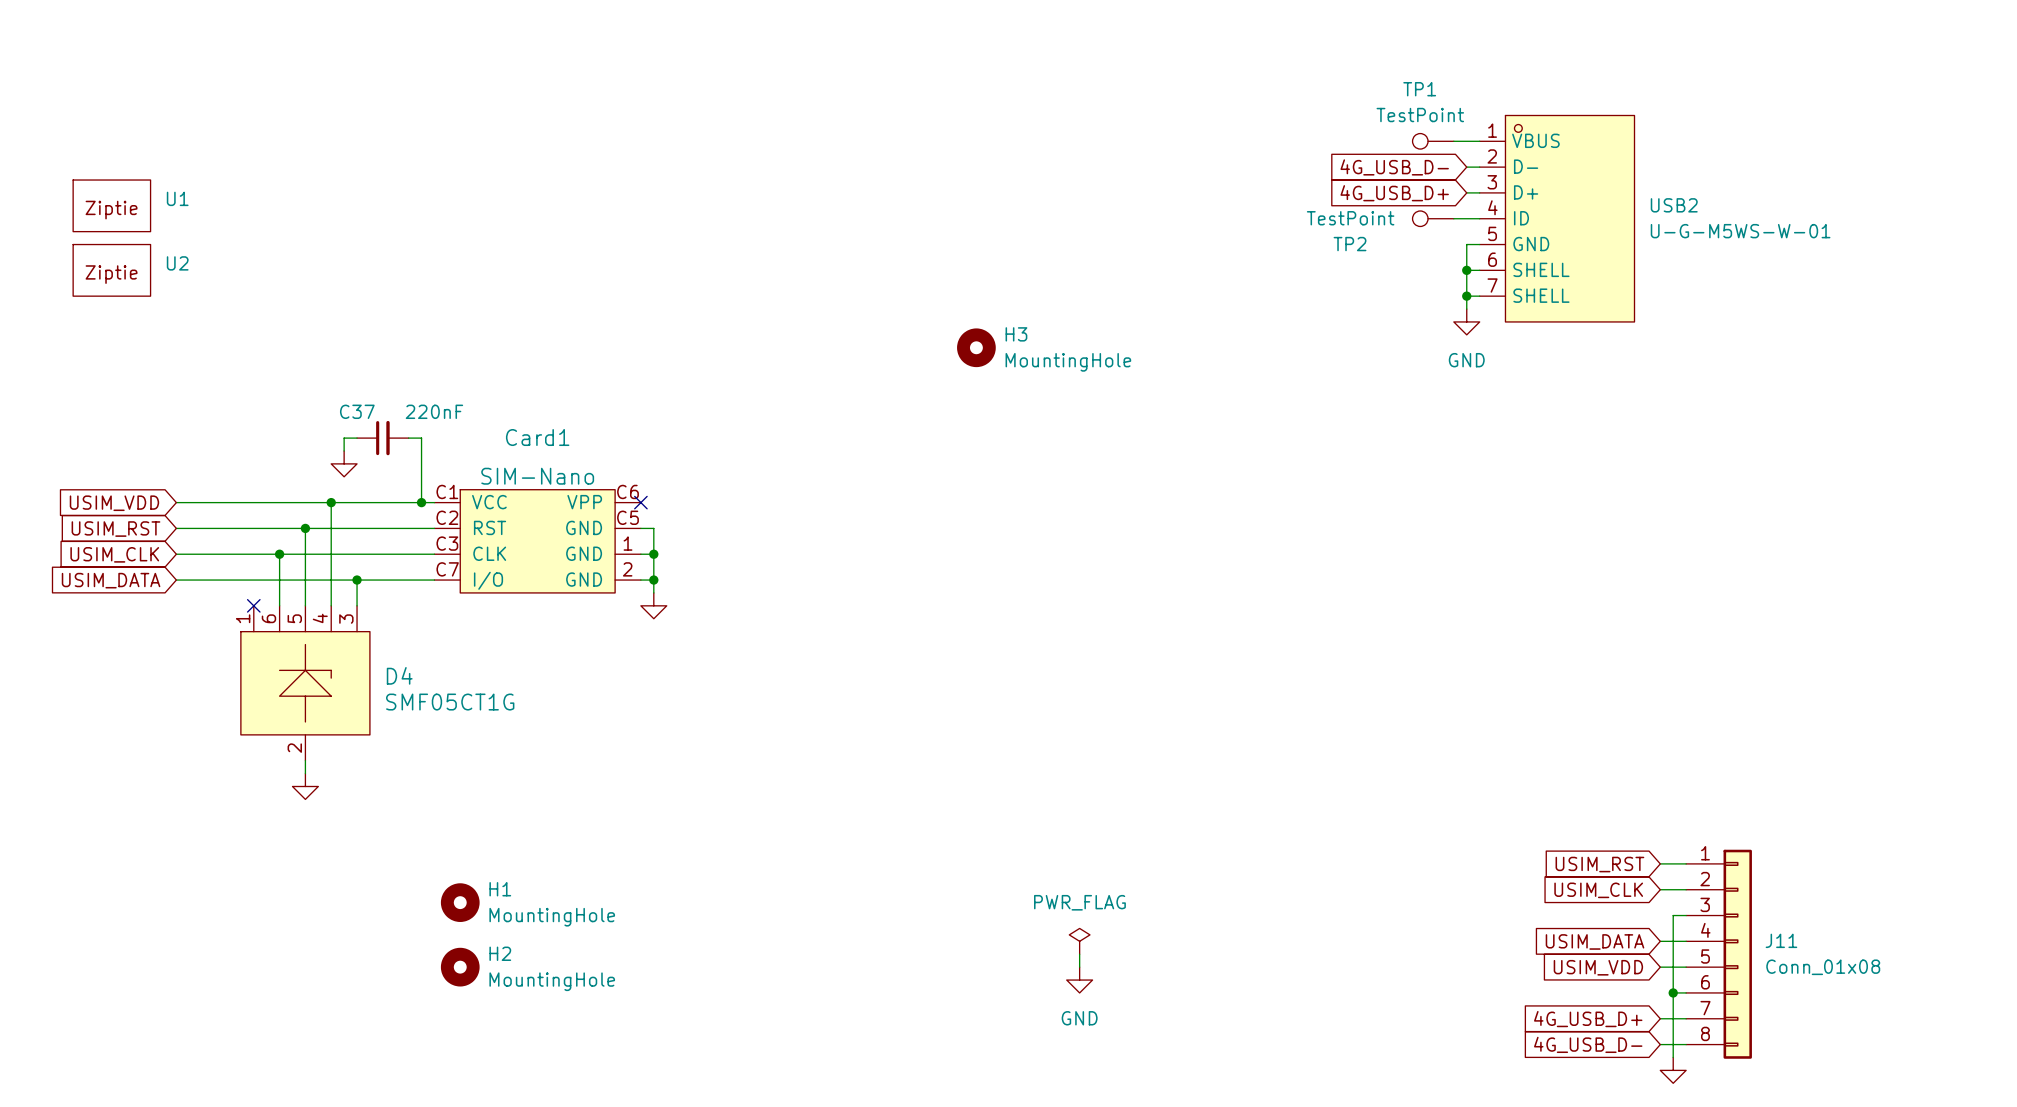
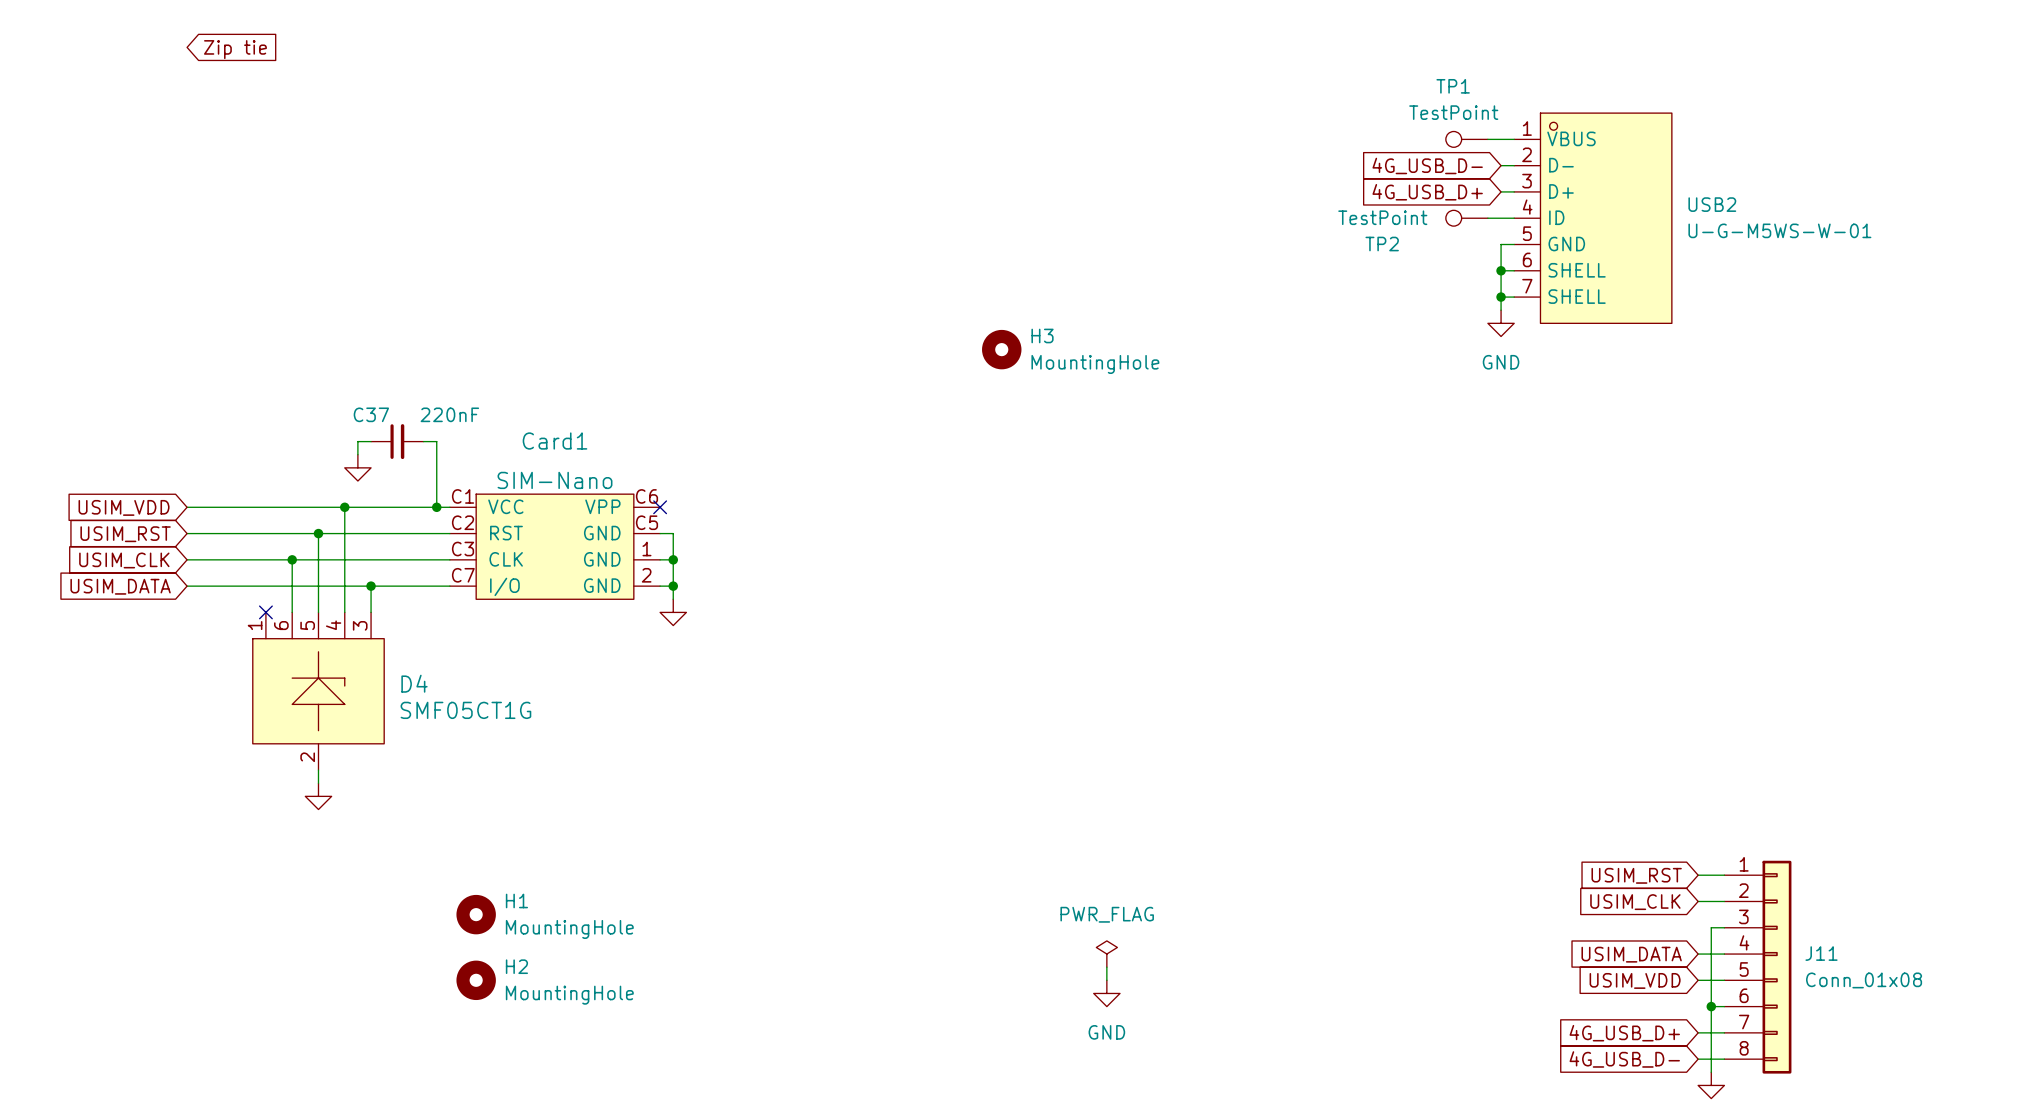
global label: none -> Zip tie (235, 49)
U1: (111, 205) -> none
U2: (111, 270) -> none

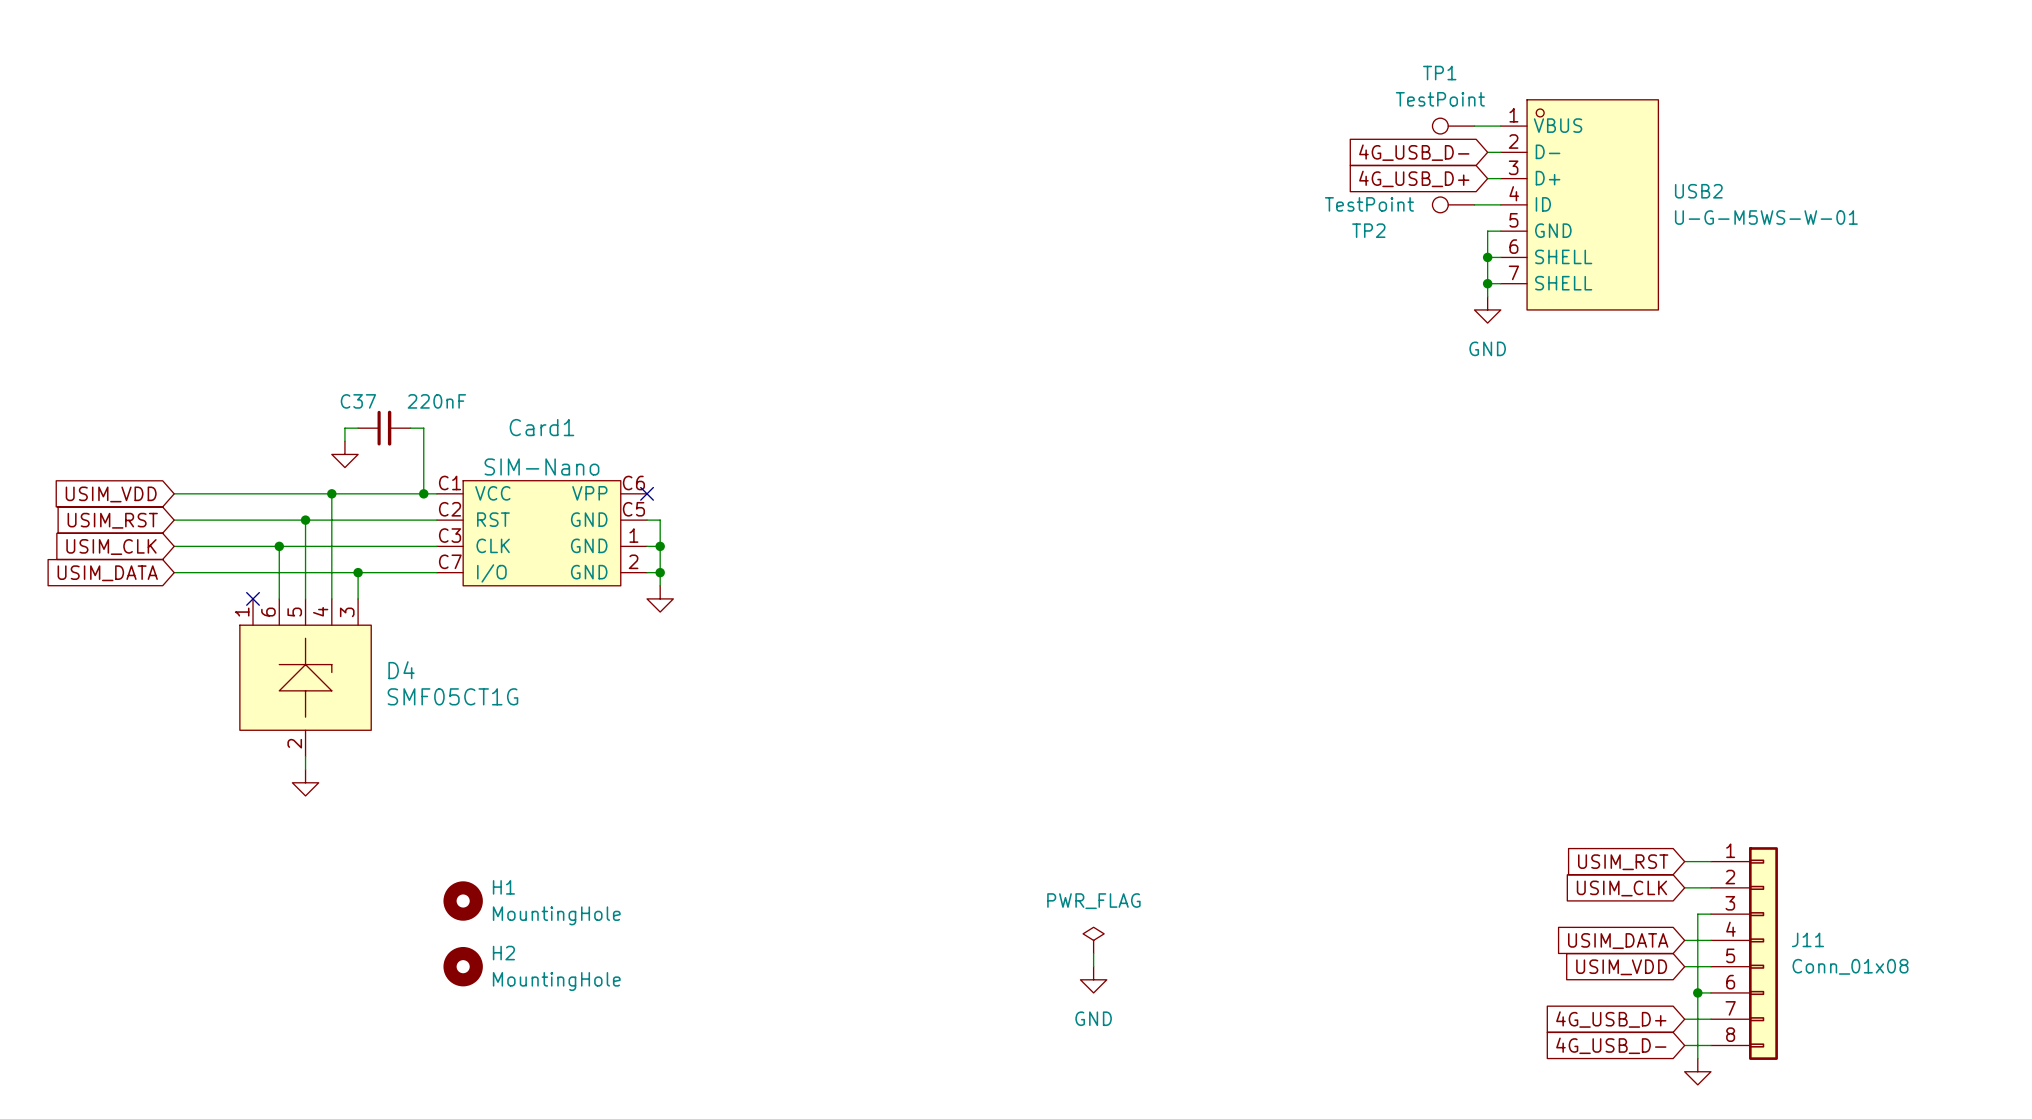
global label: Zip tie (235, 49) -> none
H3: MountingHole (1001, 349) -> none

